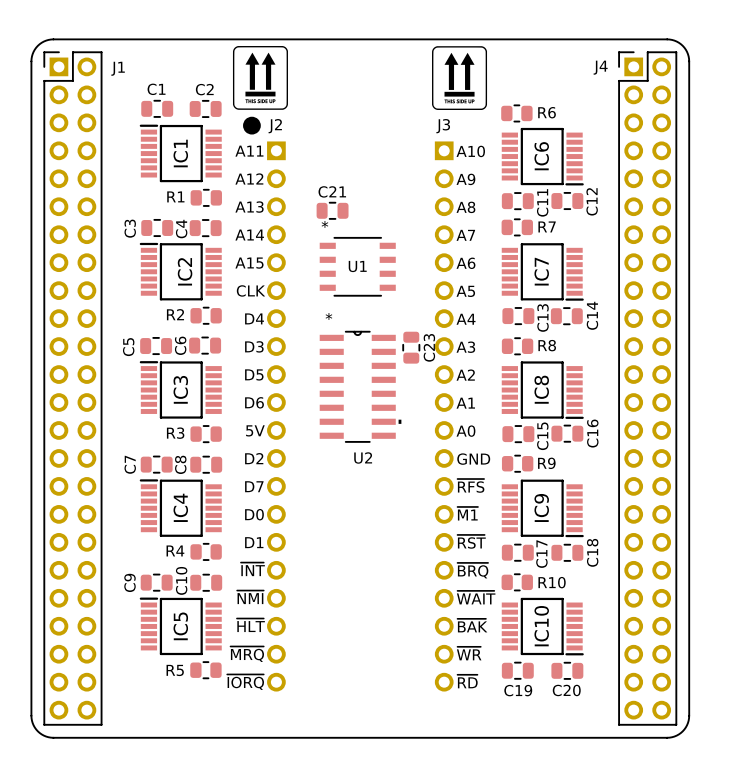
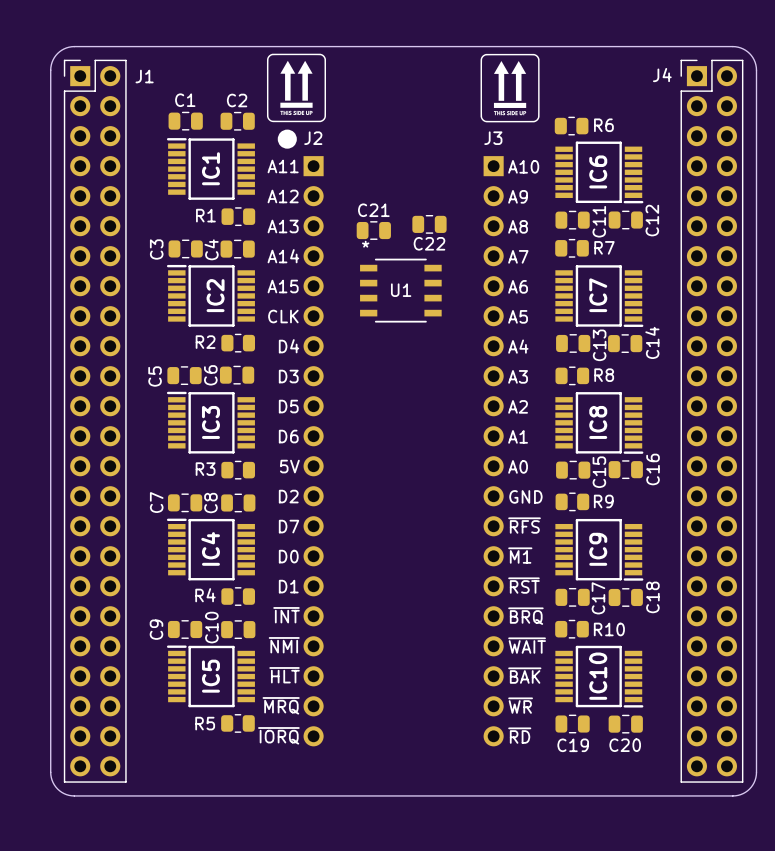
C22: none -> (429, 224)
C23: (411, 347) -> none
U2: (360, 386) -> none

